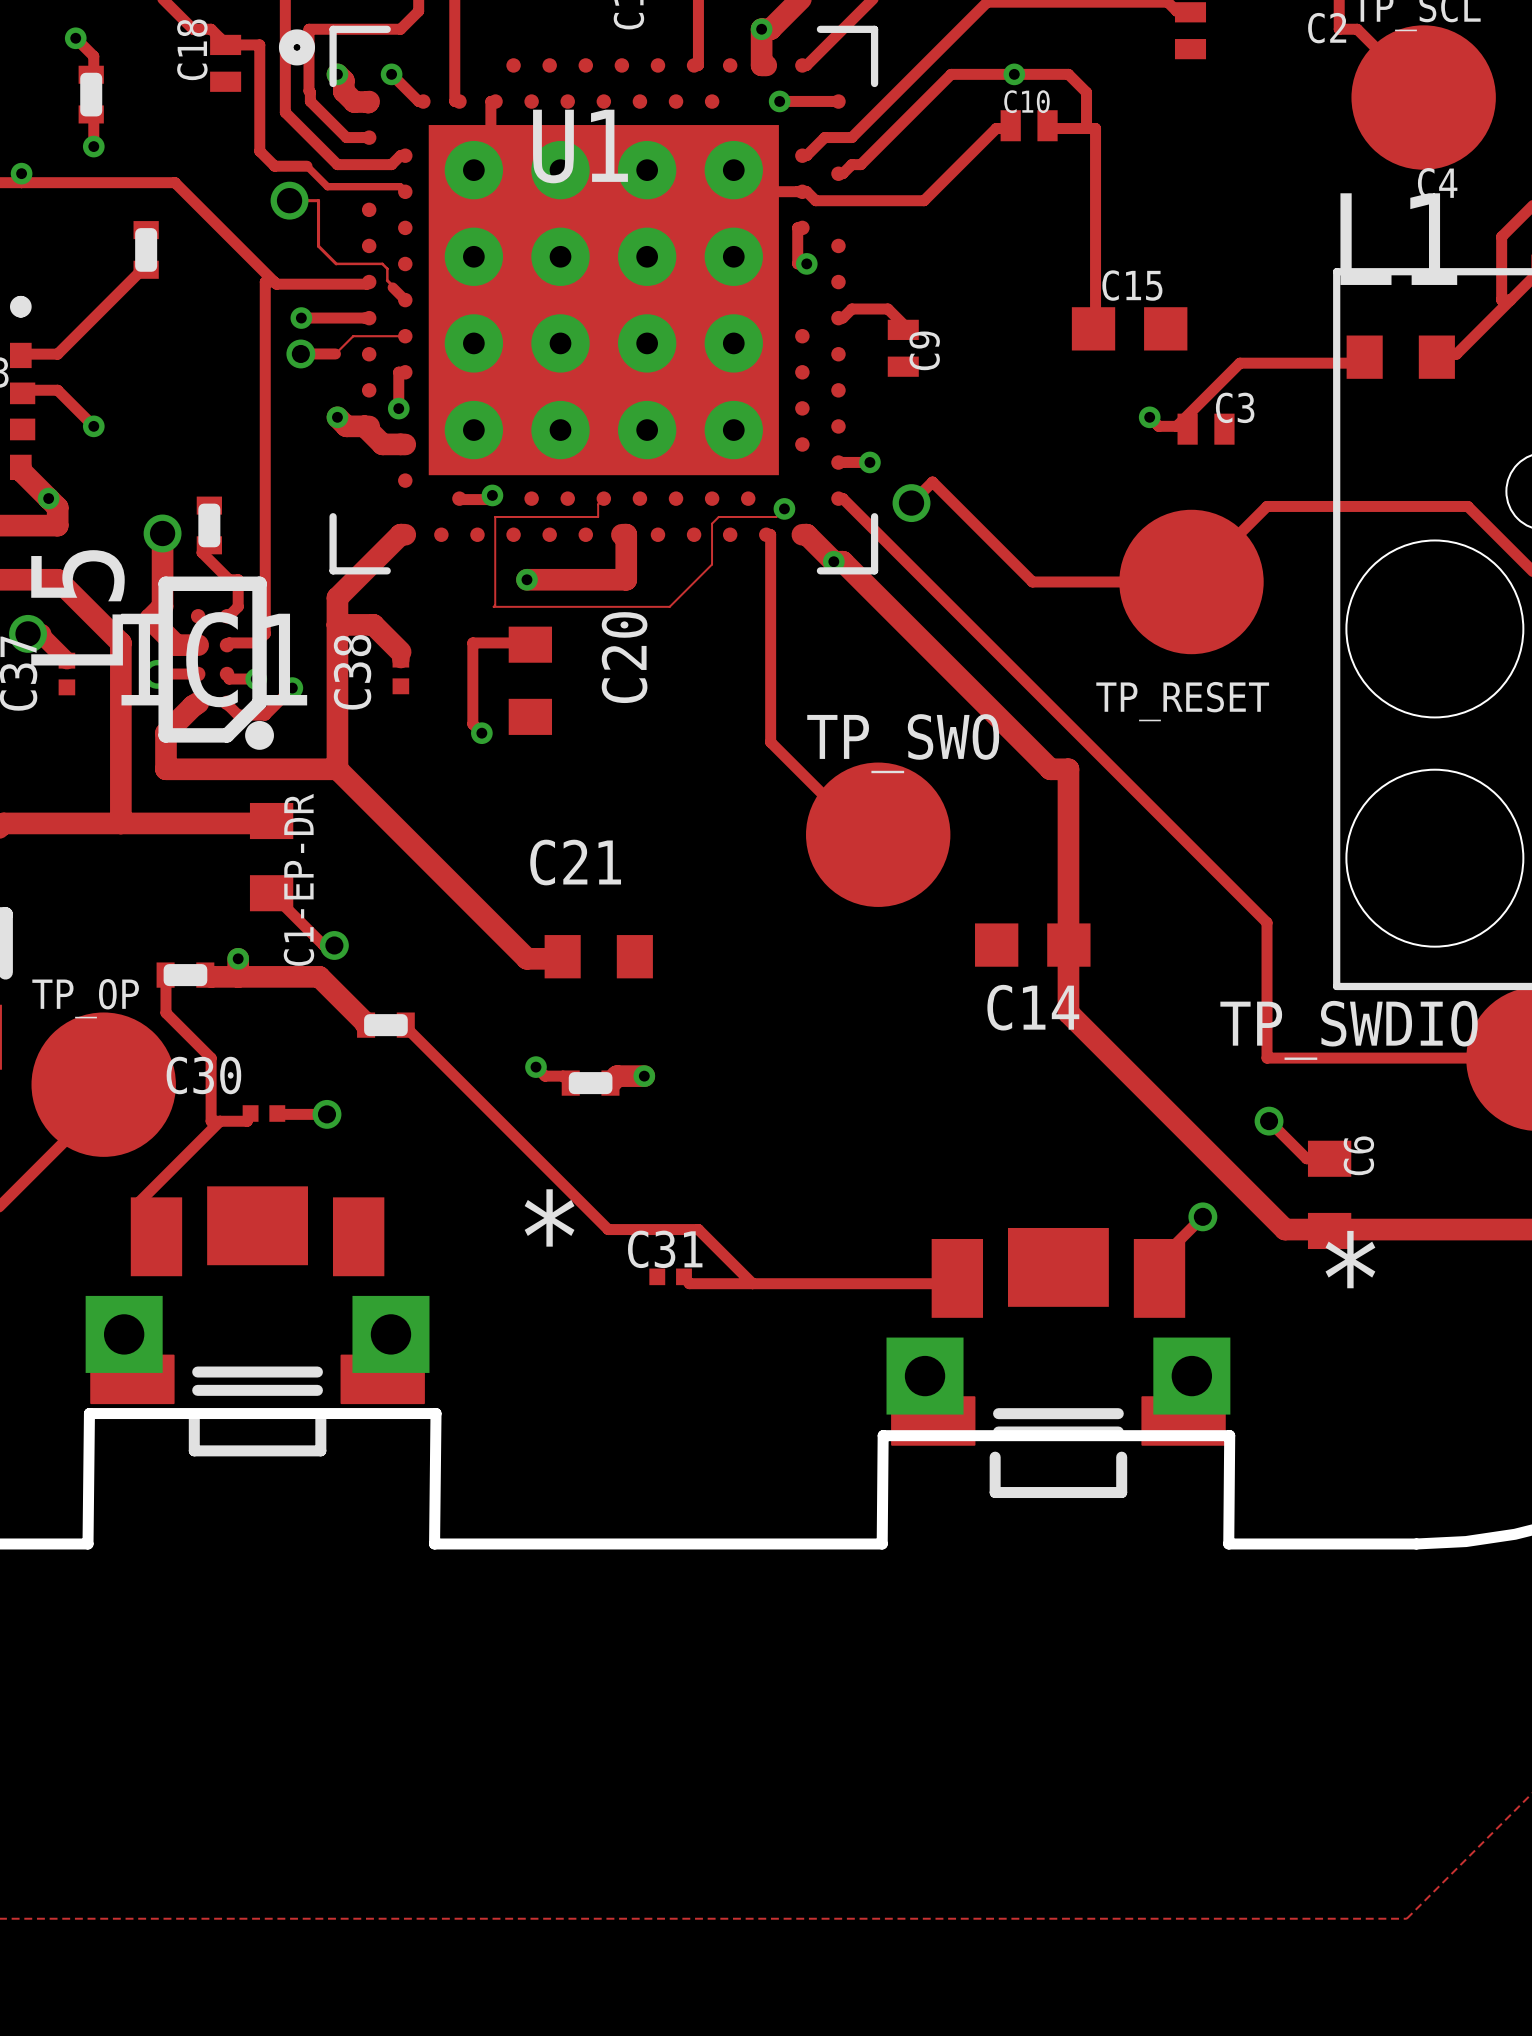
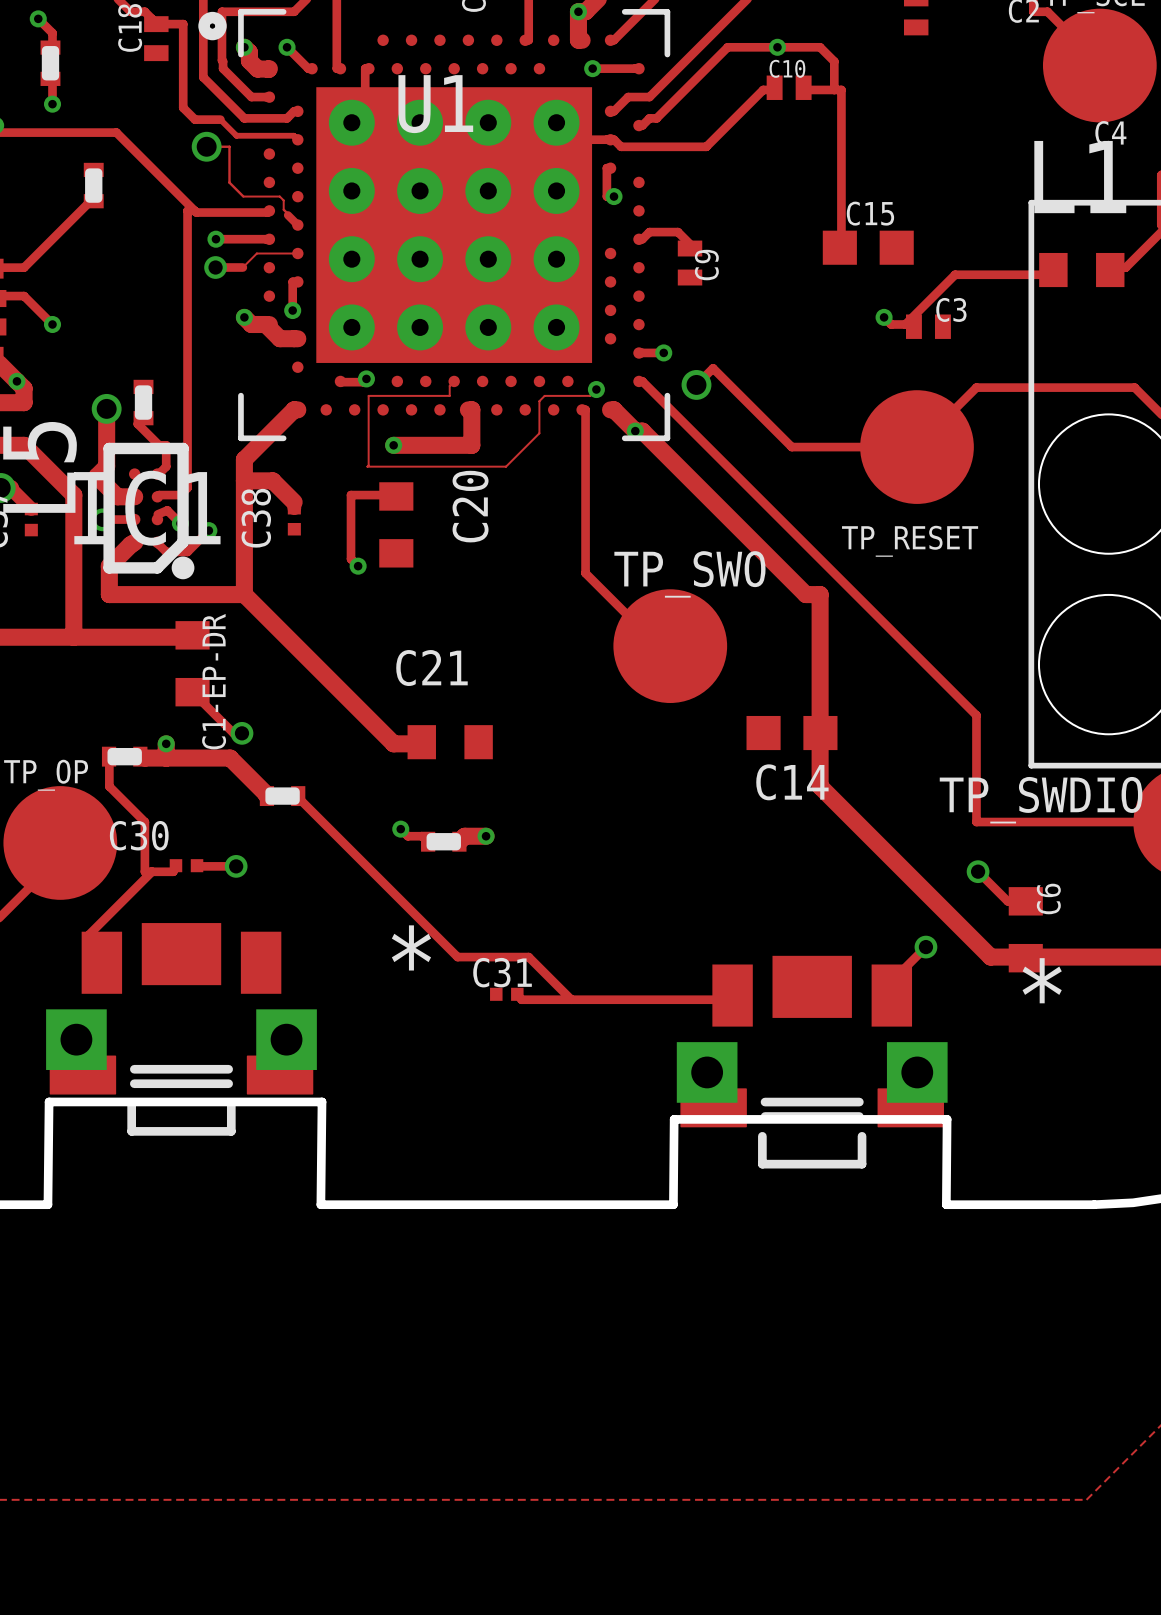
track: (227, 674) (229, 679) (256, 679) -> (157, 514) (167, 510) (180, 523)

